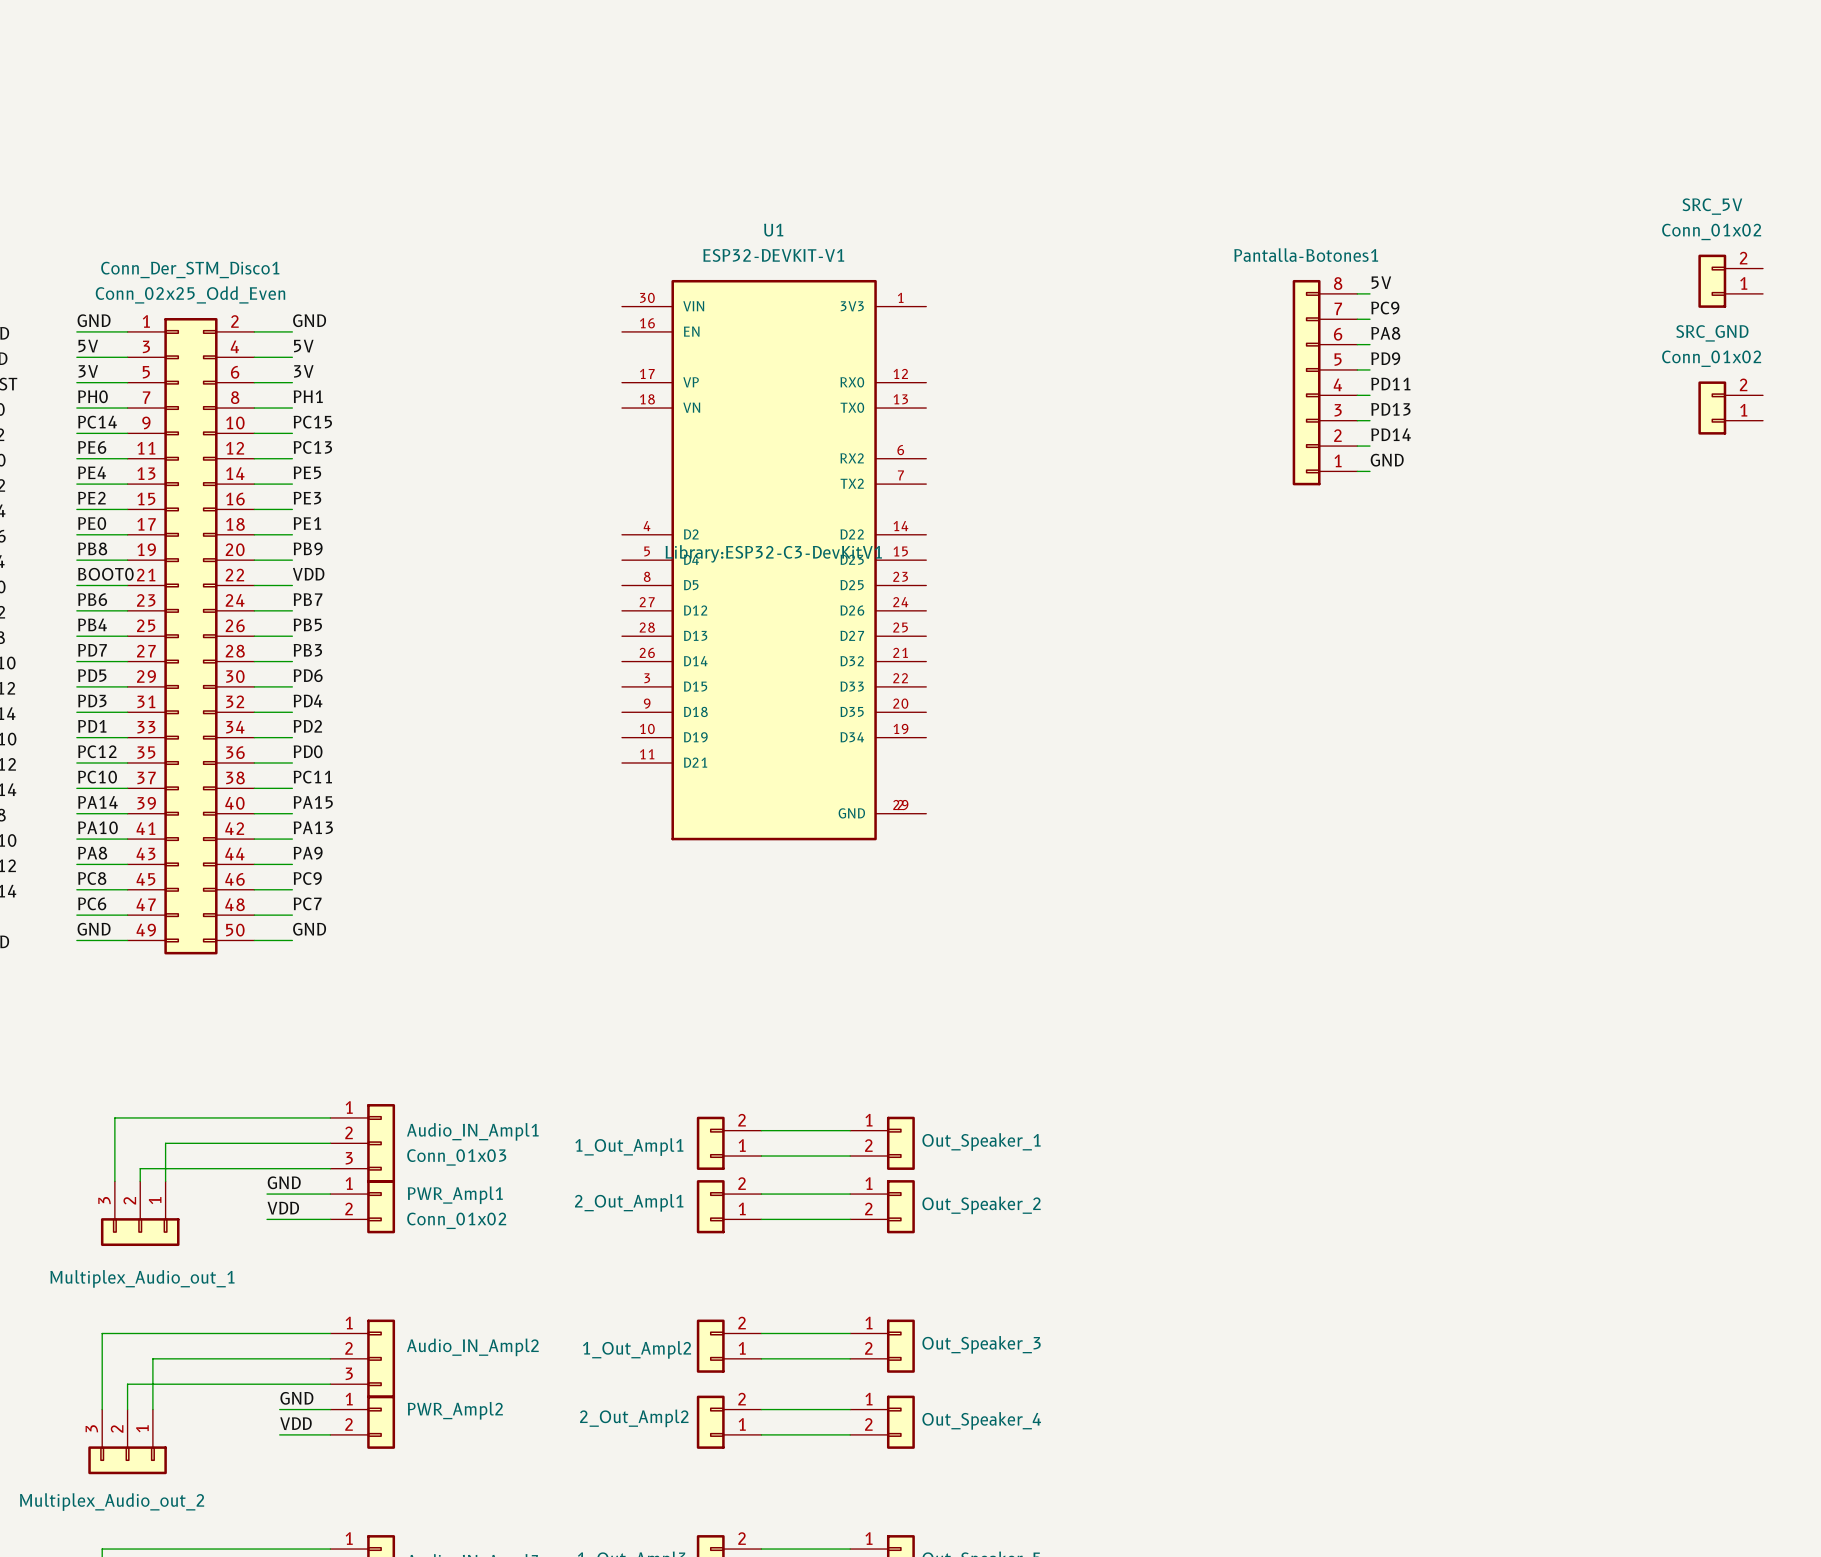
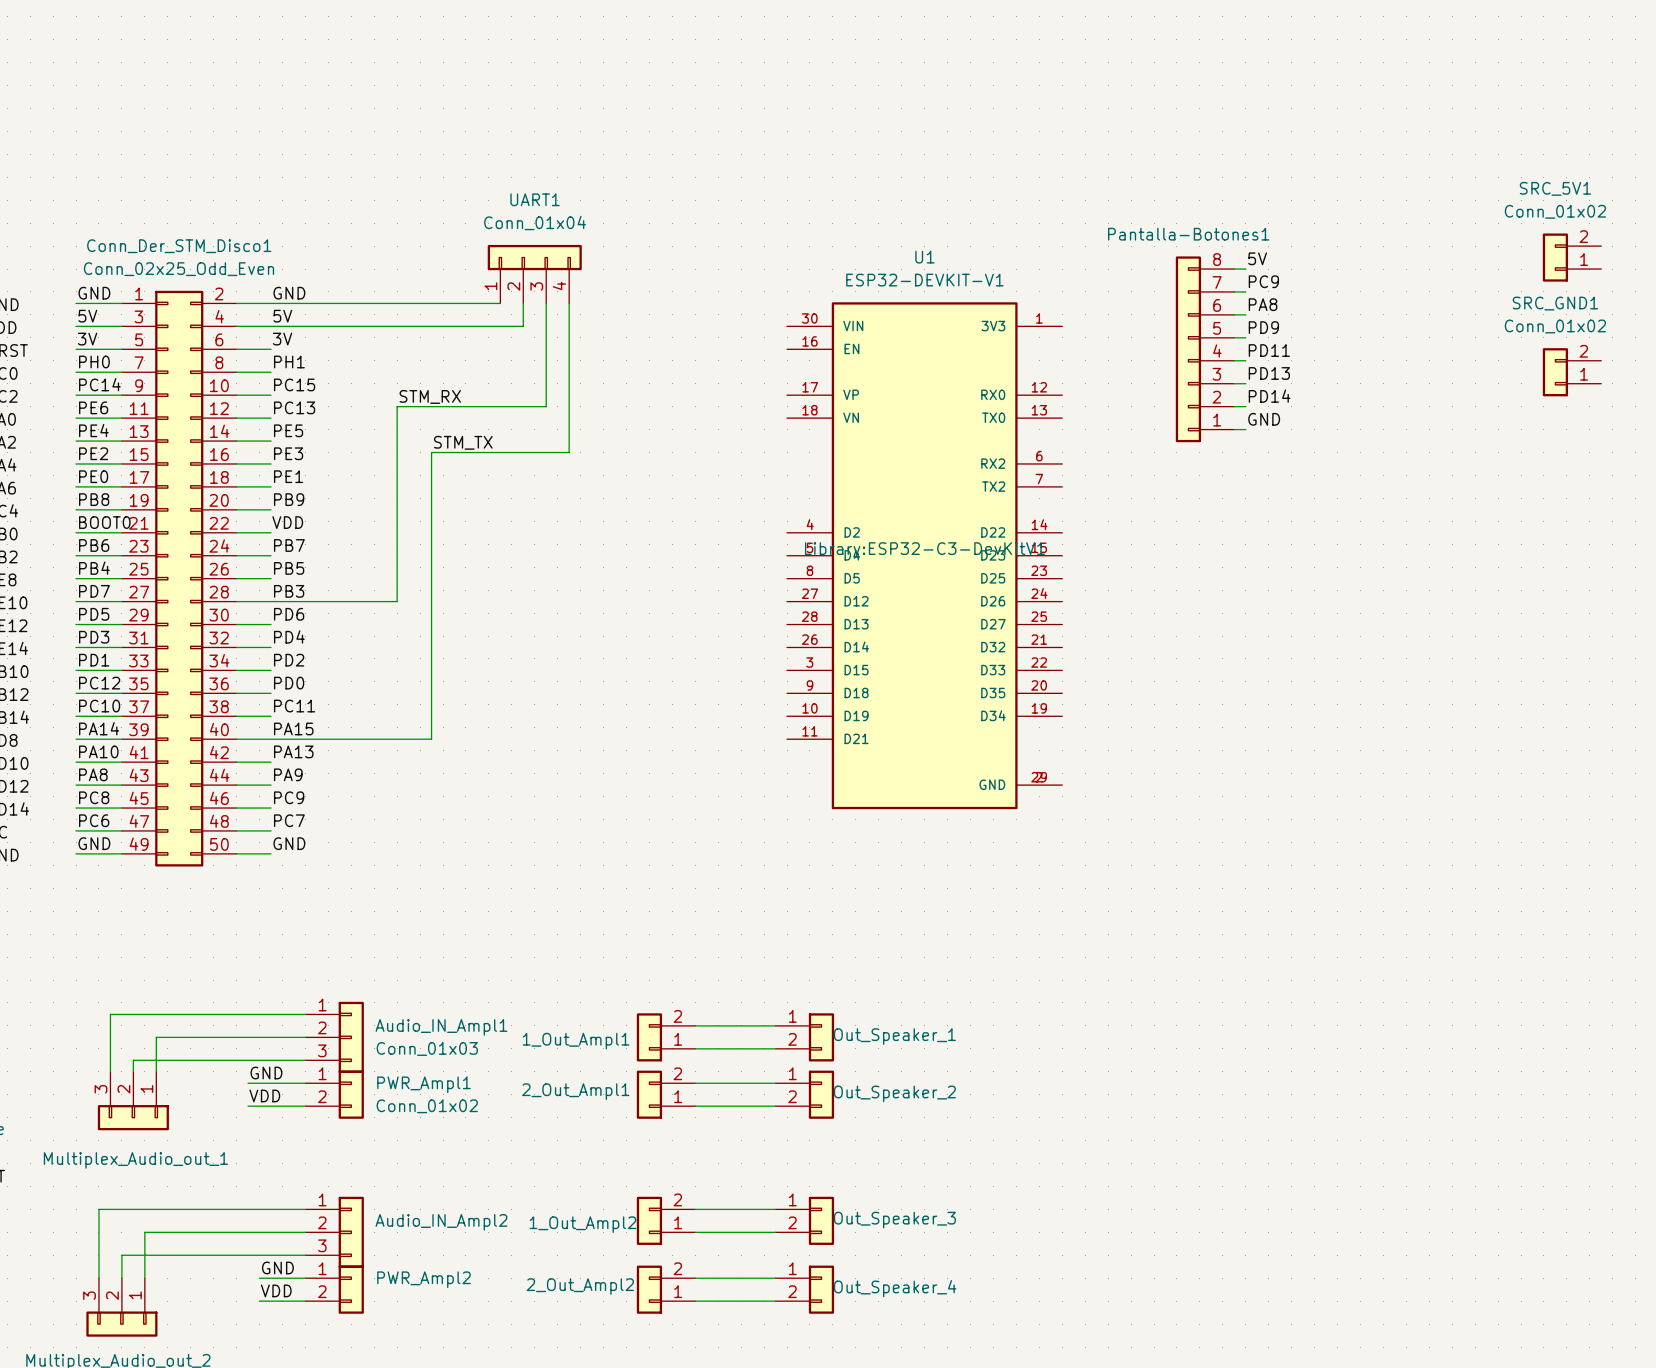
SRC_5V name: SRC_5V (1712, 206) -> SRC_5V1 (1555, 188)
UART1: none -> Conn_01x04 (534, 274)
wire: none -> (271, 303) (500, 303)
wire: none -> (523, 303) (523, 326) (271, 326)
wire: none -> (546, 303) (546, 406) (397, 406) (397, 601) (271, 601)
wire: none -> (569, 303) (569, 452) (431, 452) (431, 739) (271, 739)
SRC_GND name: SRC_GND (1712, 333) -> SRC_GND1 (1555, 303)
label: none -> STM_RX (430, 396)
label: none -> STM_TX (463, 442)
U1 position: (774, 560) -> (924, 555)

